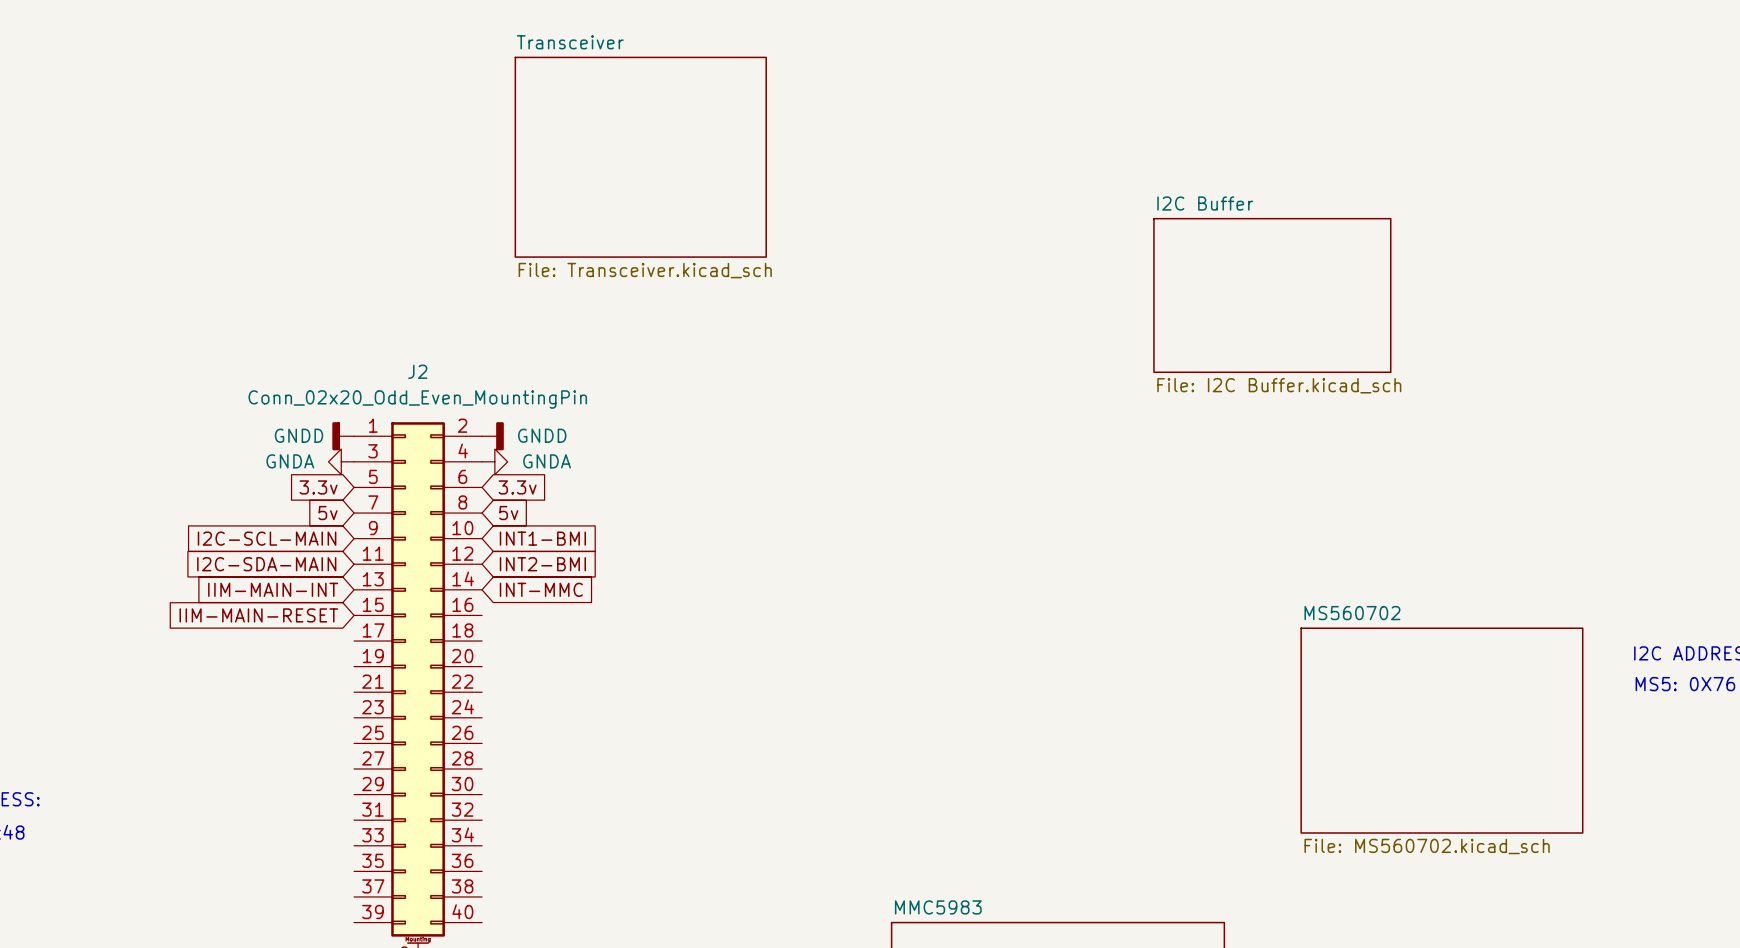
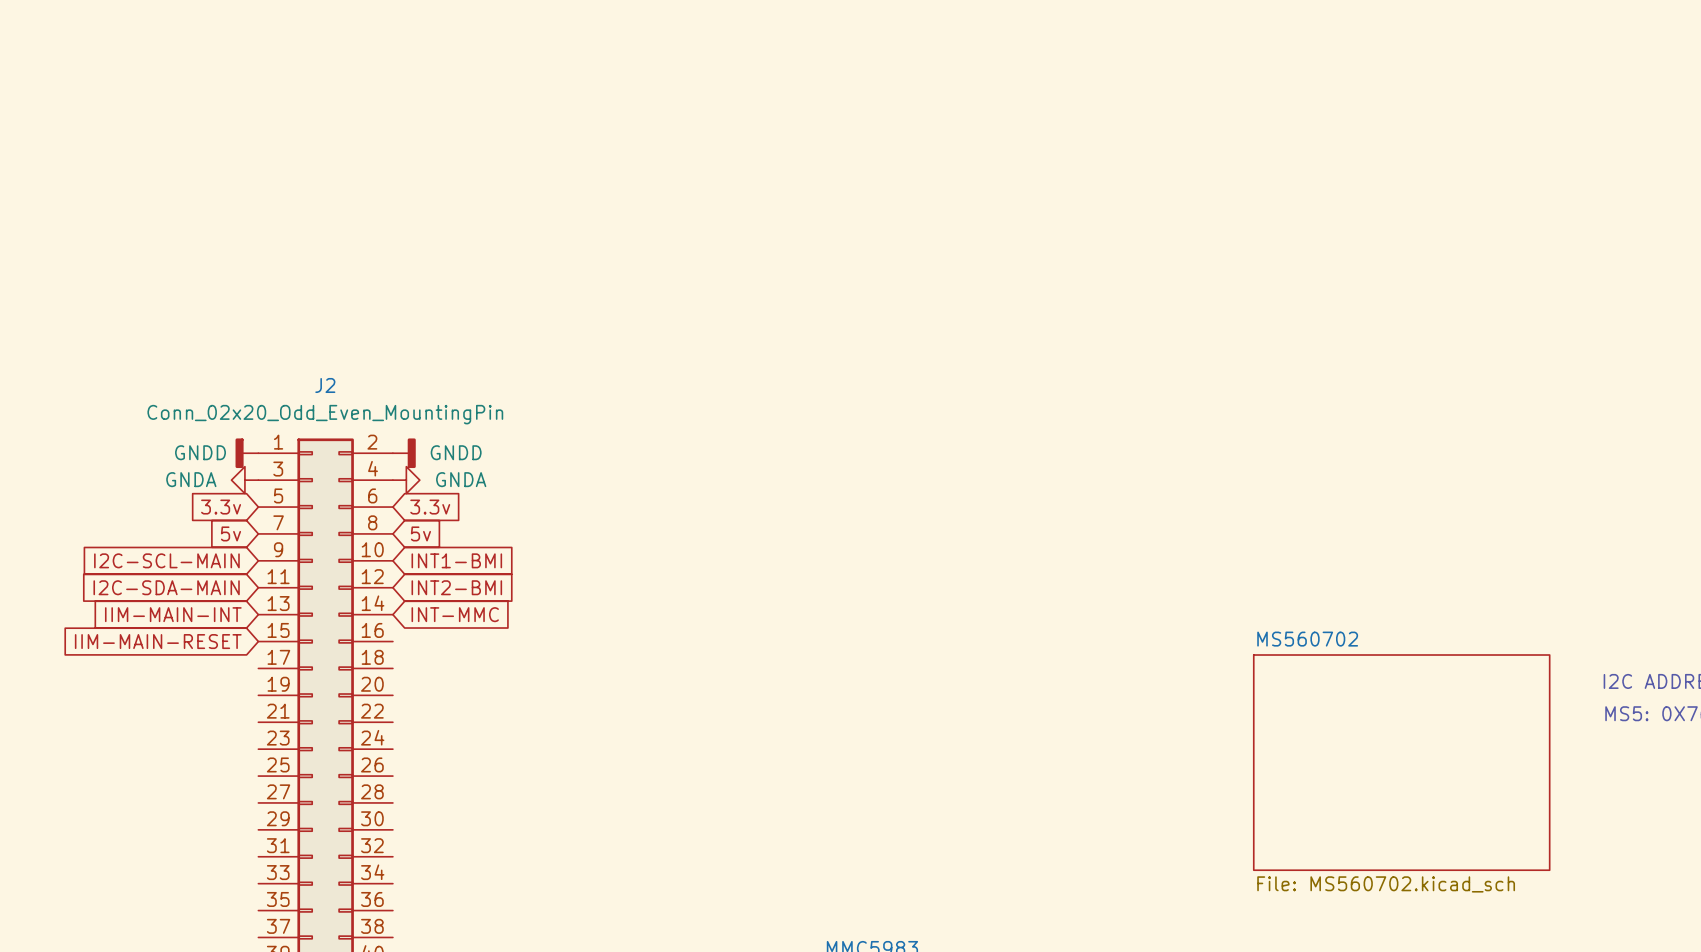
sheet Transceiver: File: Transceiver.kicad_sch (640, 157) -> none
sheet I2C Buffer: File: I2C Buffer.kicad_sch (1272, 295) -> none

